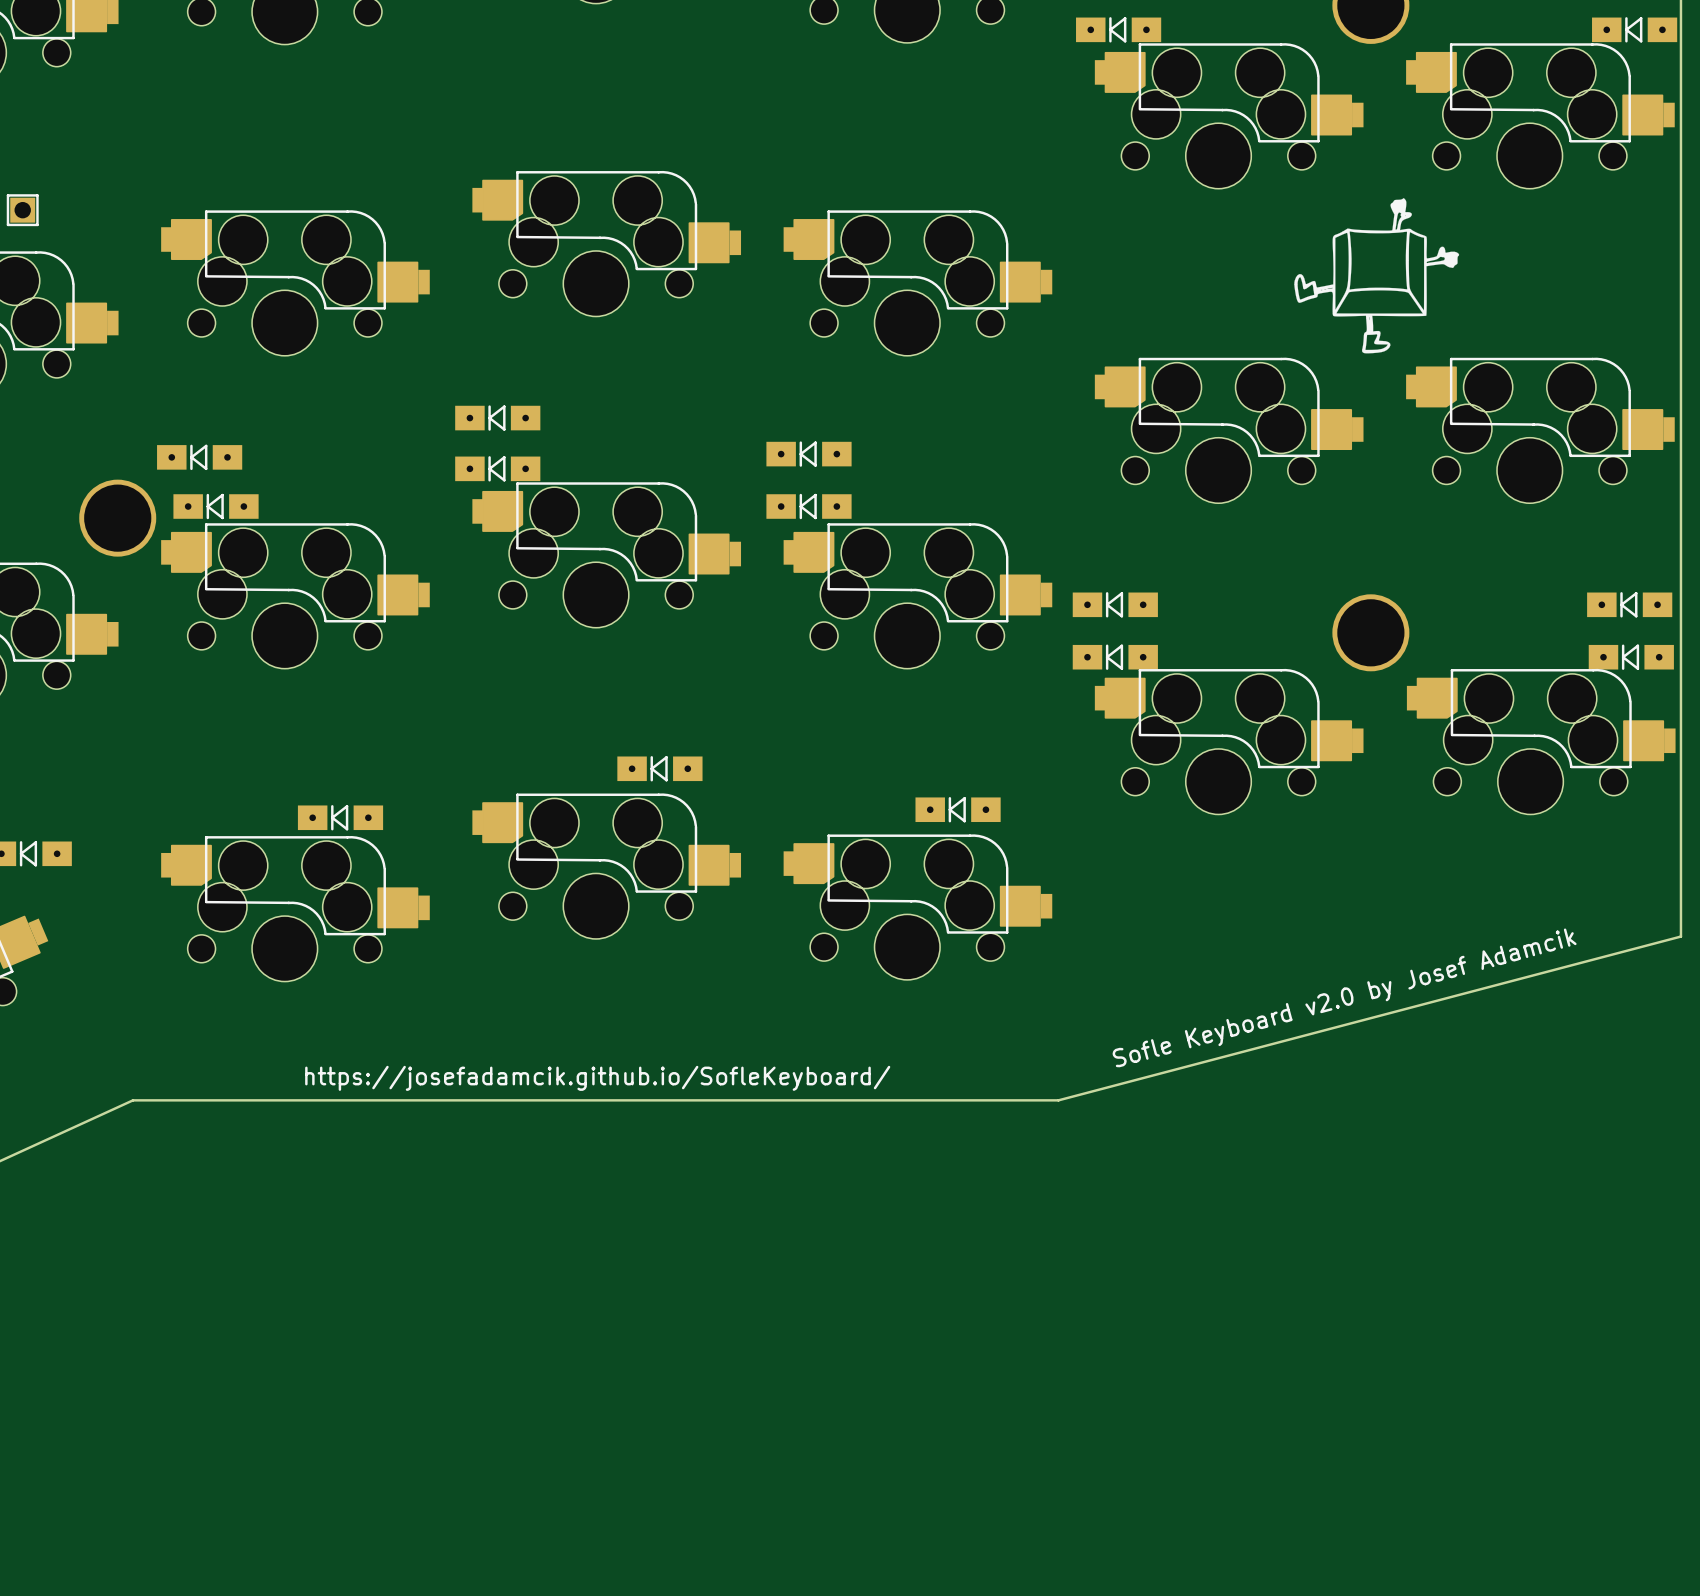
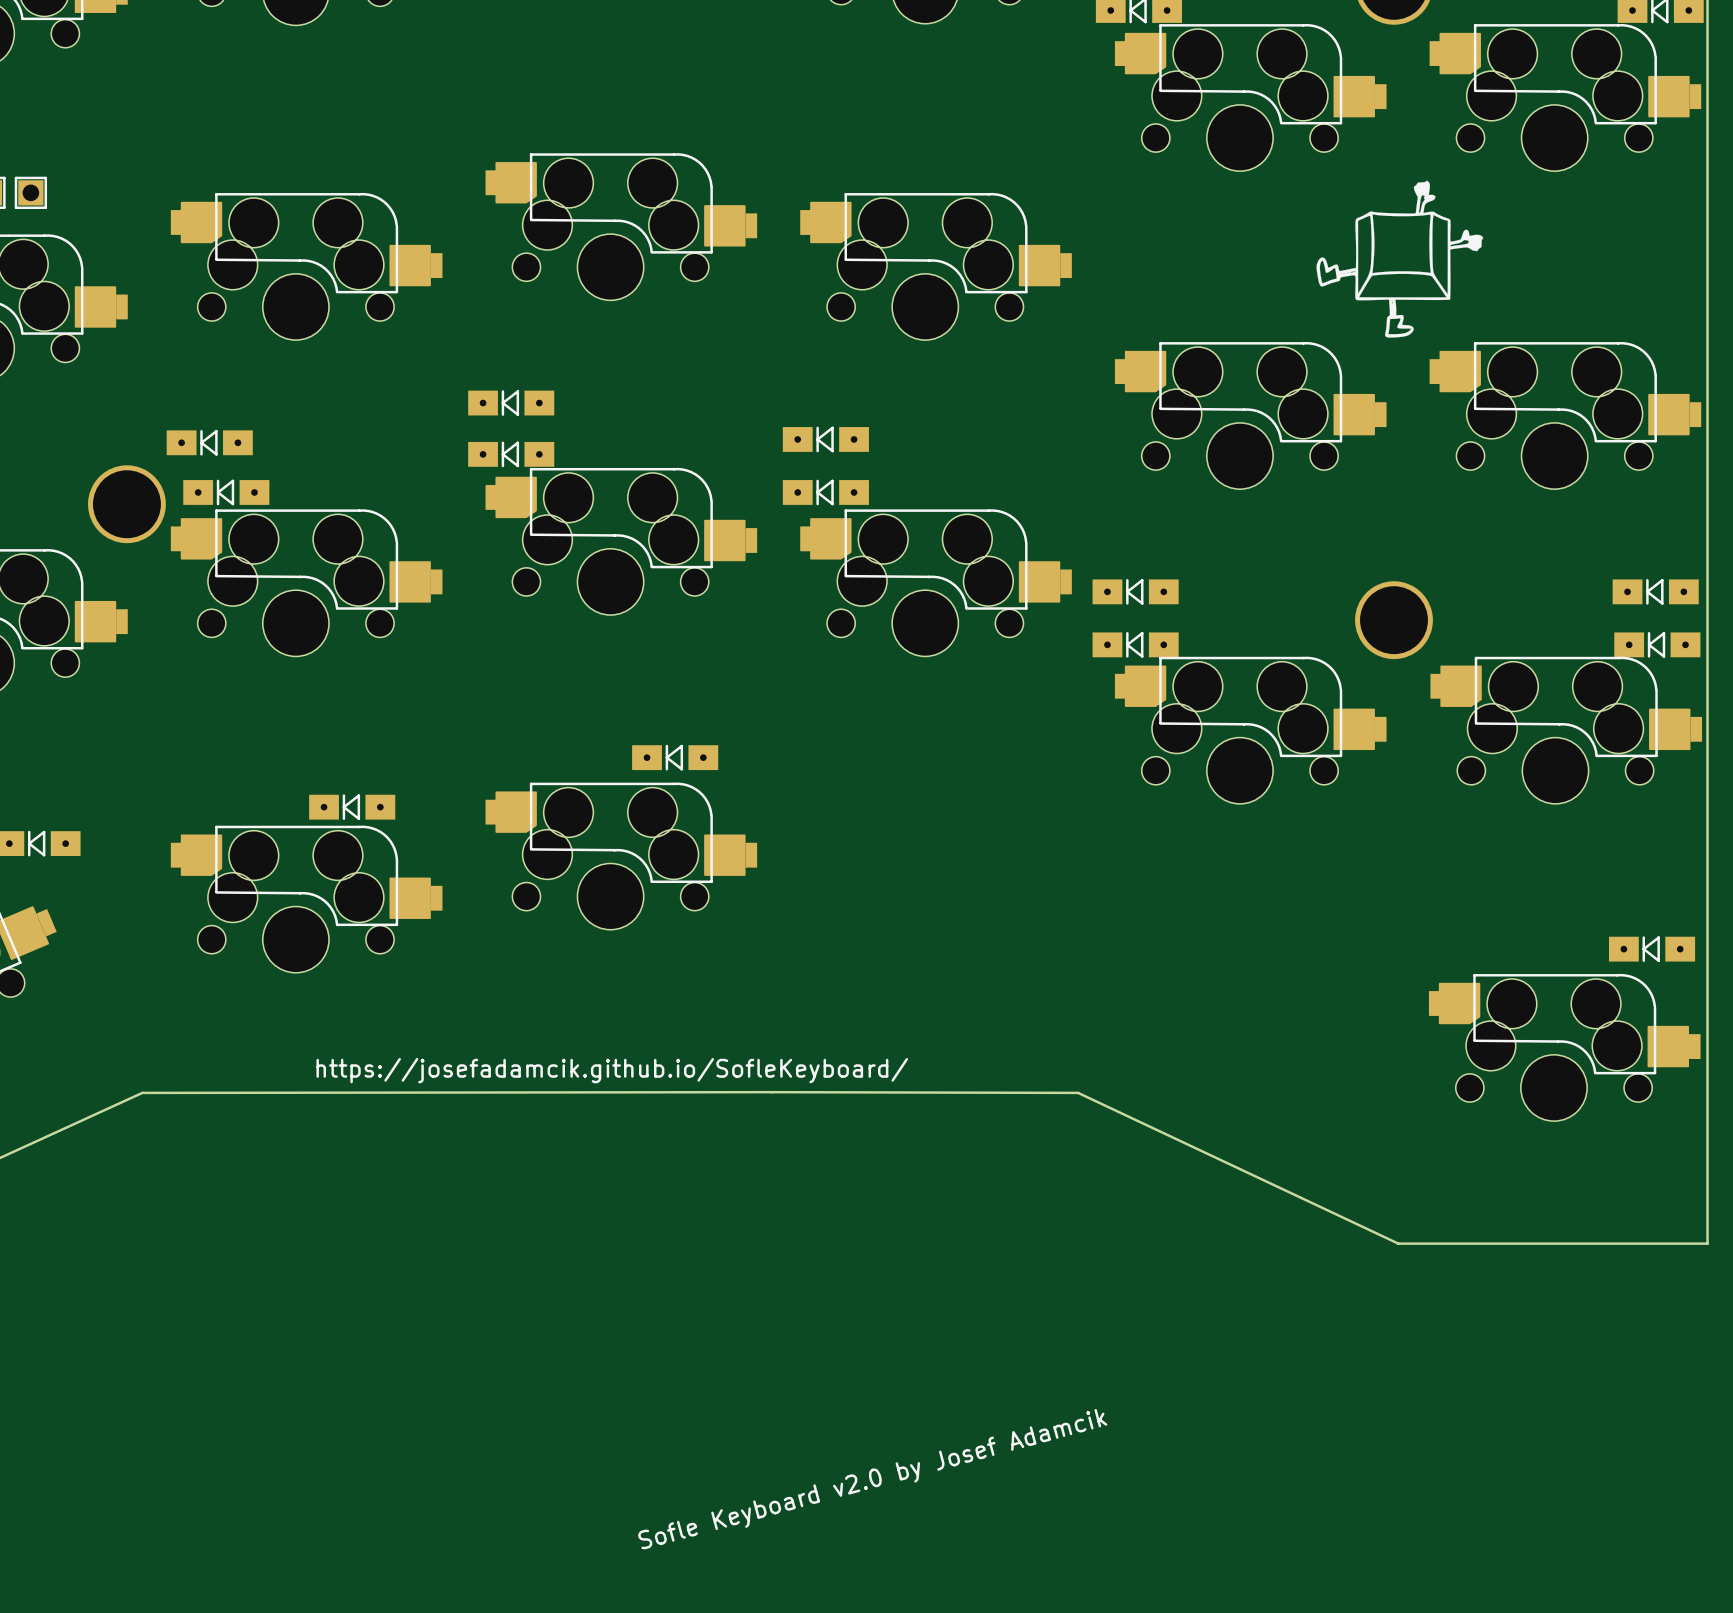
part: (958, 809) -> none
part: (917, 907) -> none
board edge: (1680, 936) (1058, 1100) (132, 1100) -> (1707, 927) (1707, 1243) (1398, 1243) (1078, 1092) (142, 1092)
part: none -> (1652, 949)
text: Sofle Keyboard v2.0 by Josef Adamcik (1344, 997) -> none
part: none -> (1564, 1047)
text: none -> Sofle Keyboard v2.0 by Josef Adamcik (872, 1479)

